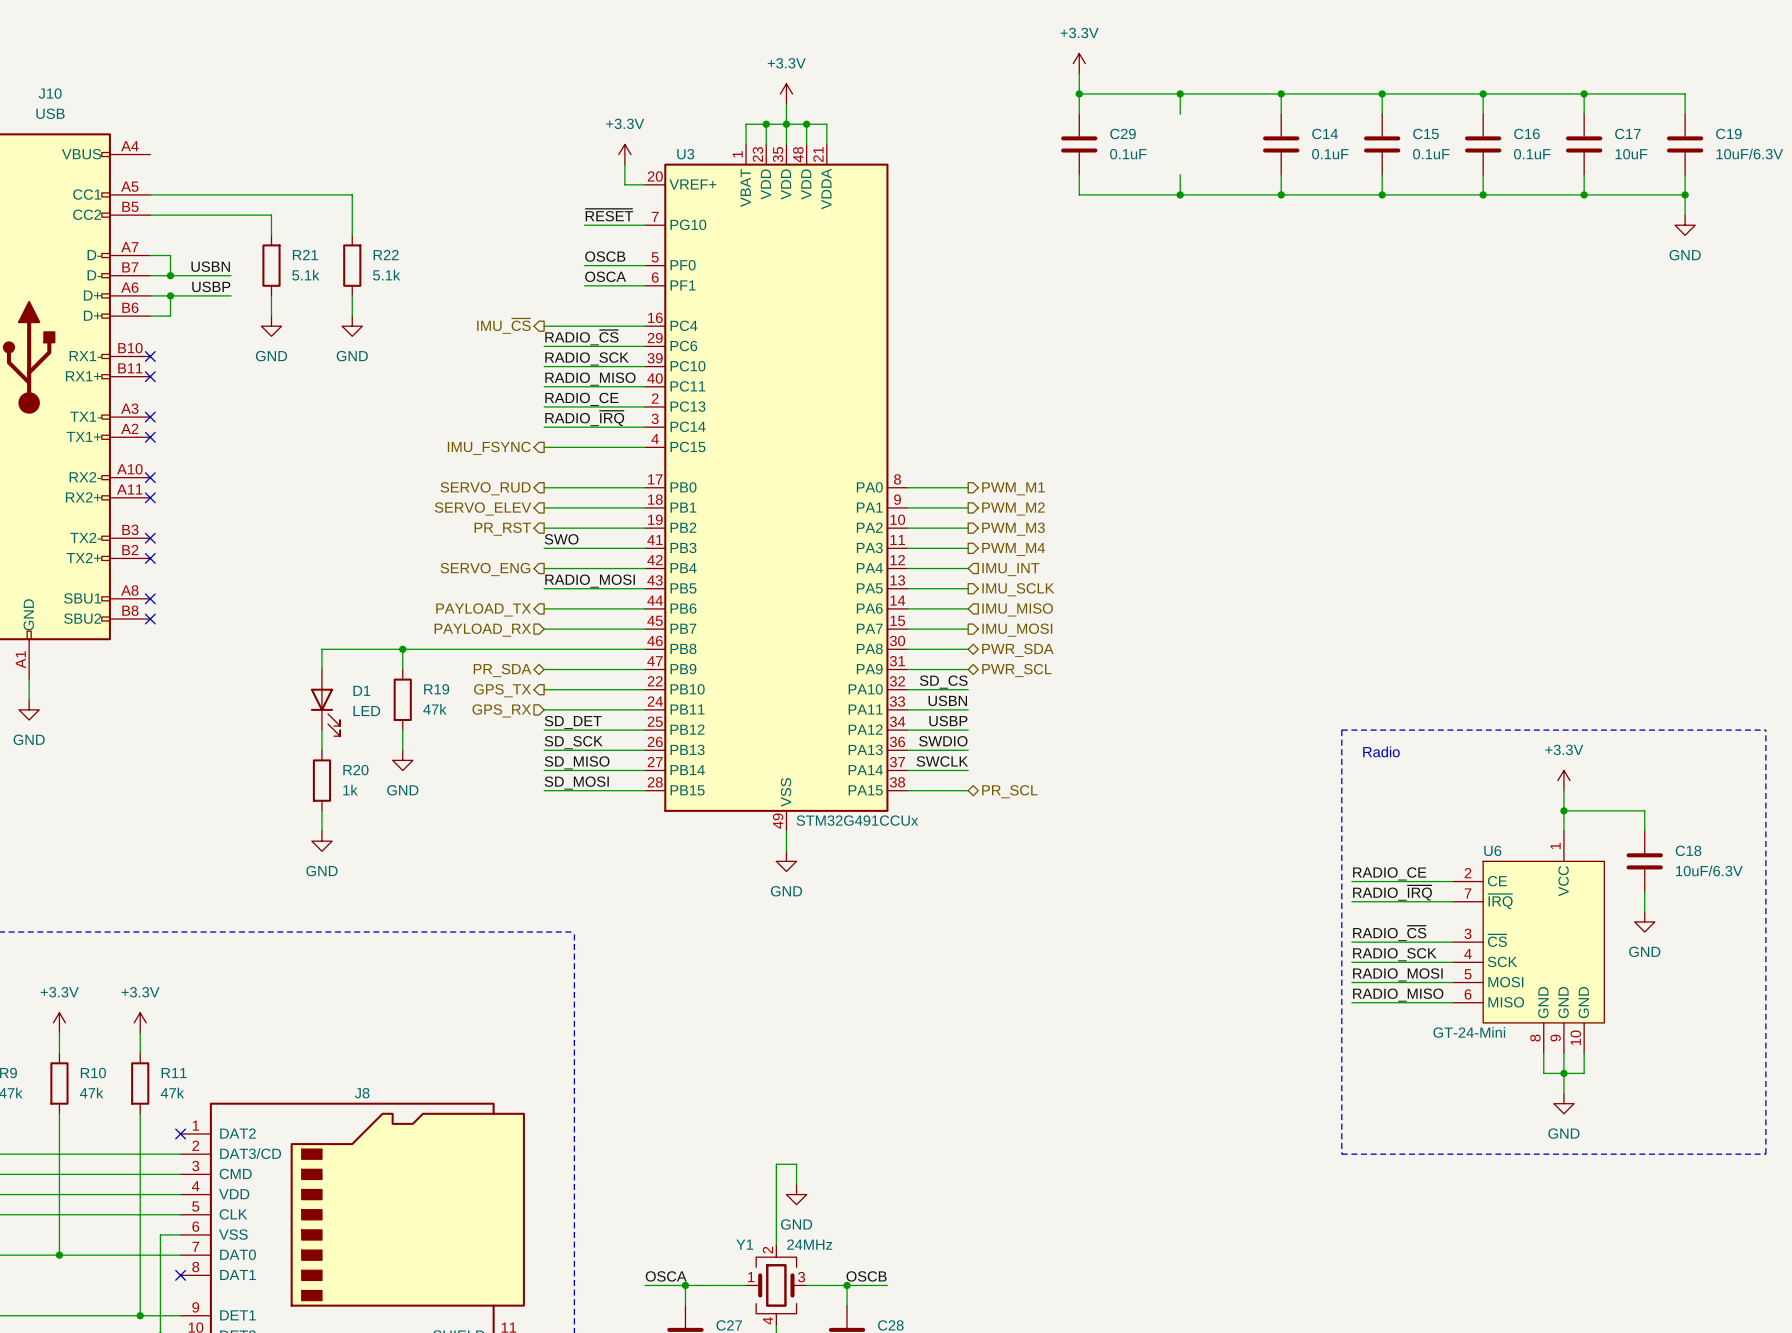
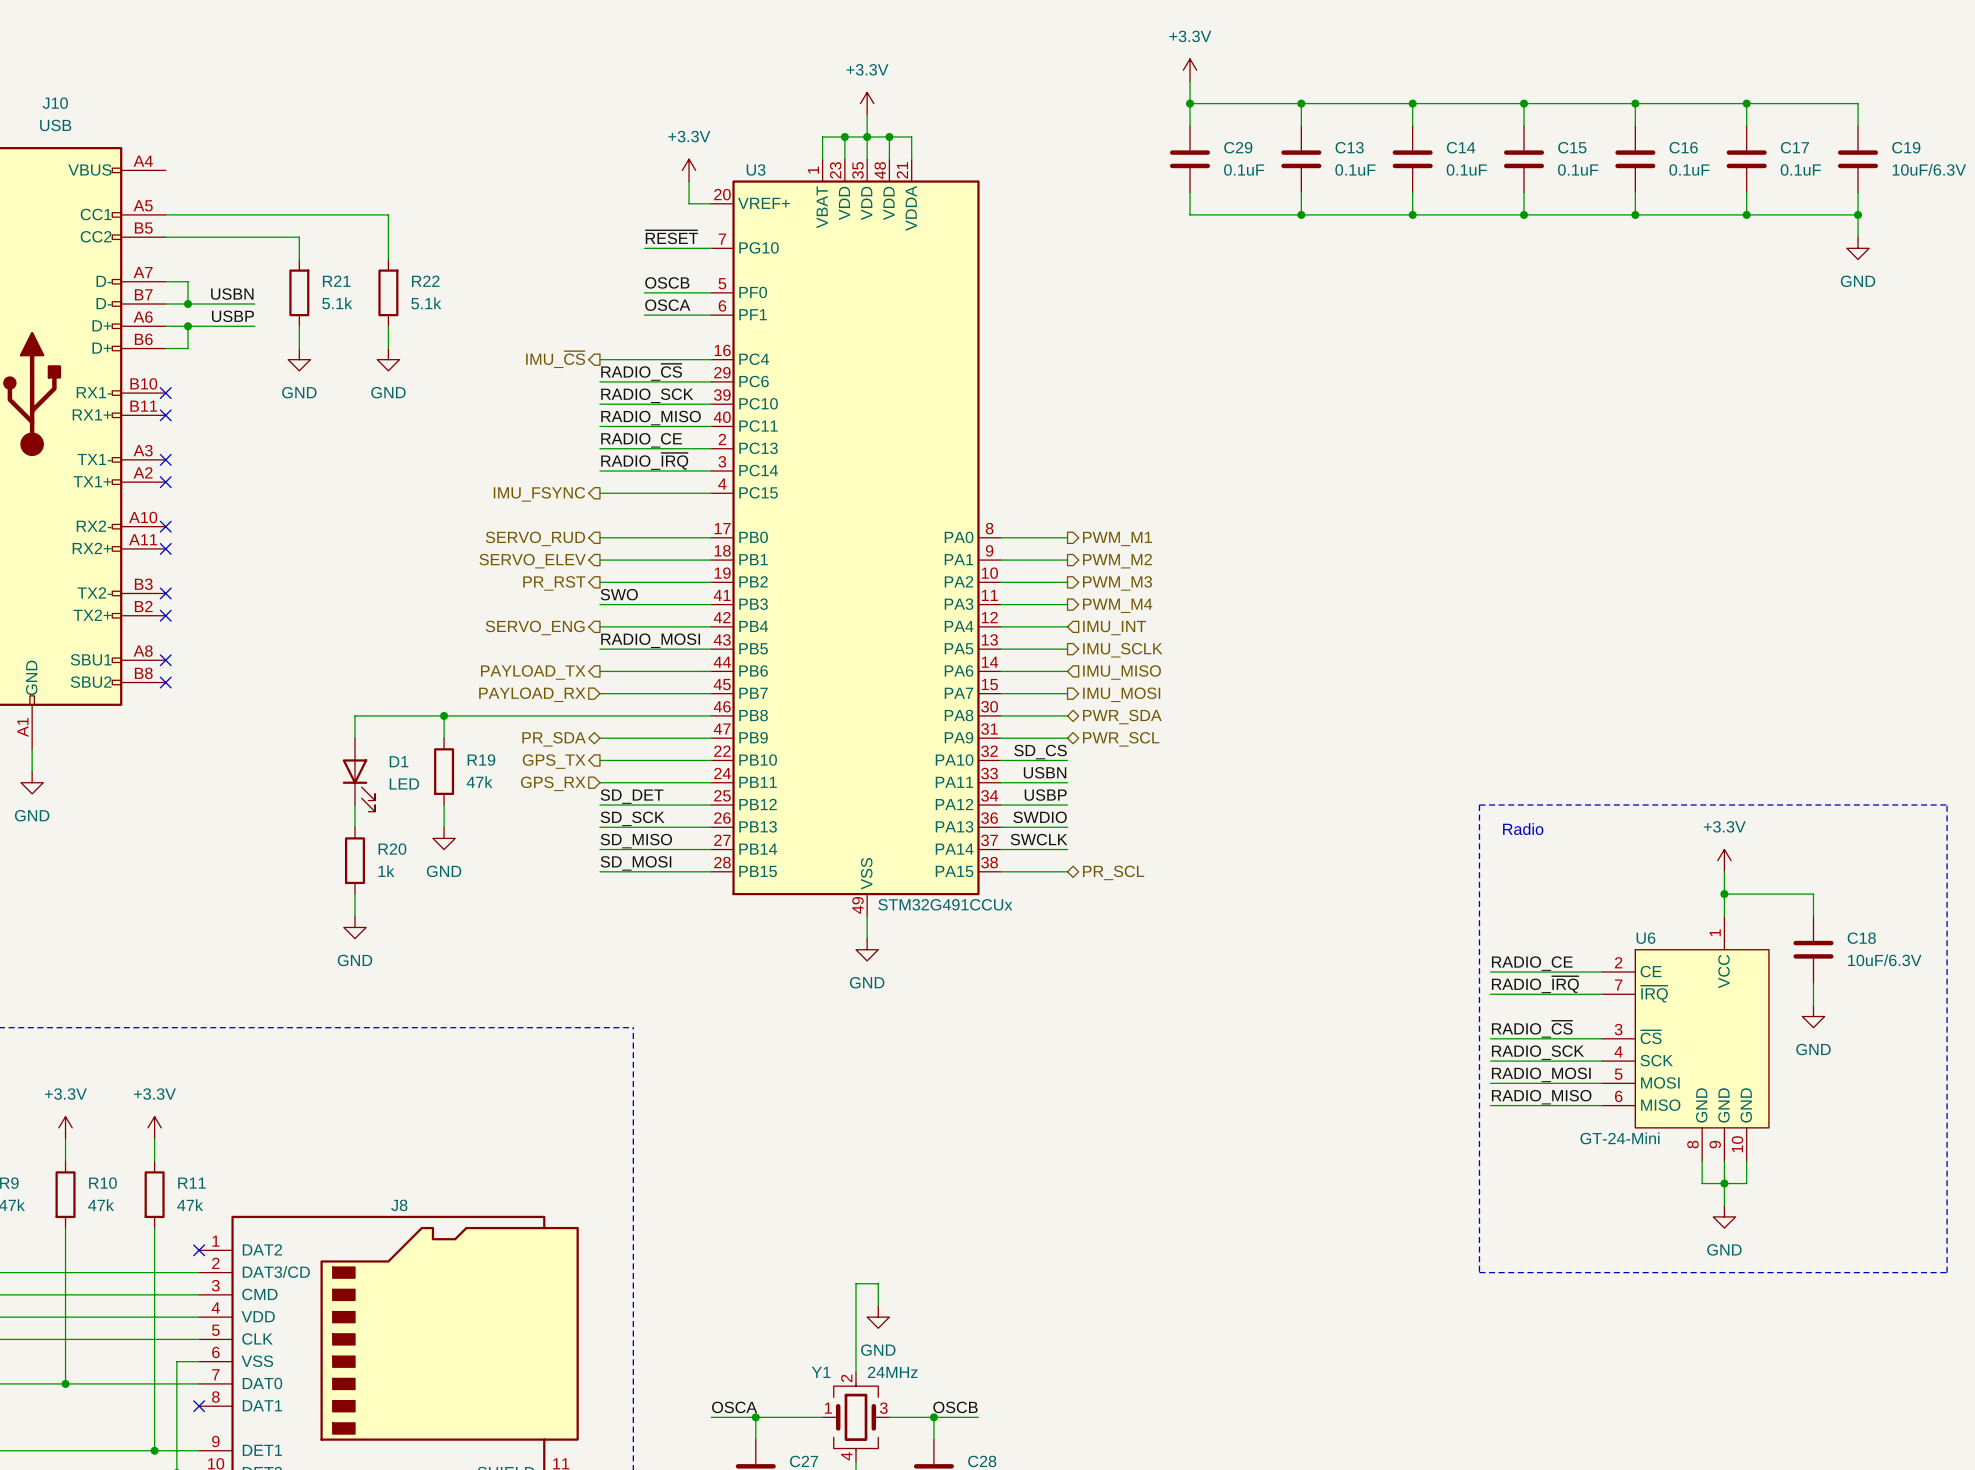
C13: none -> 0.1uF (1301, 159)
C17 value: 10uF (1631, 154) -> 0.1uF (1800, 169)

